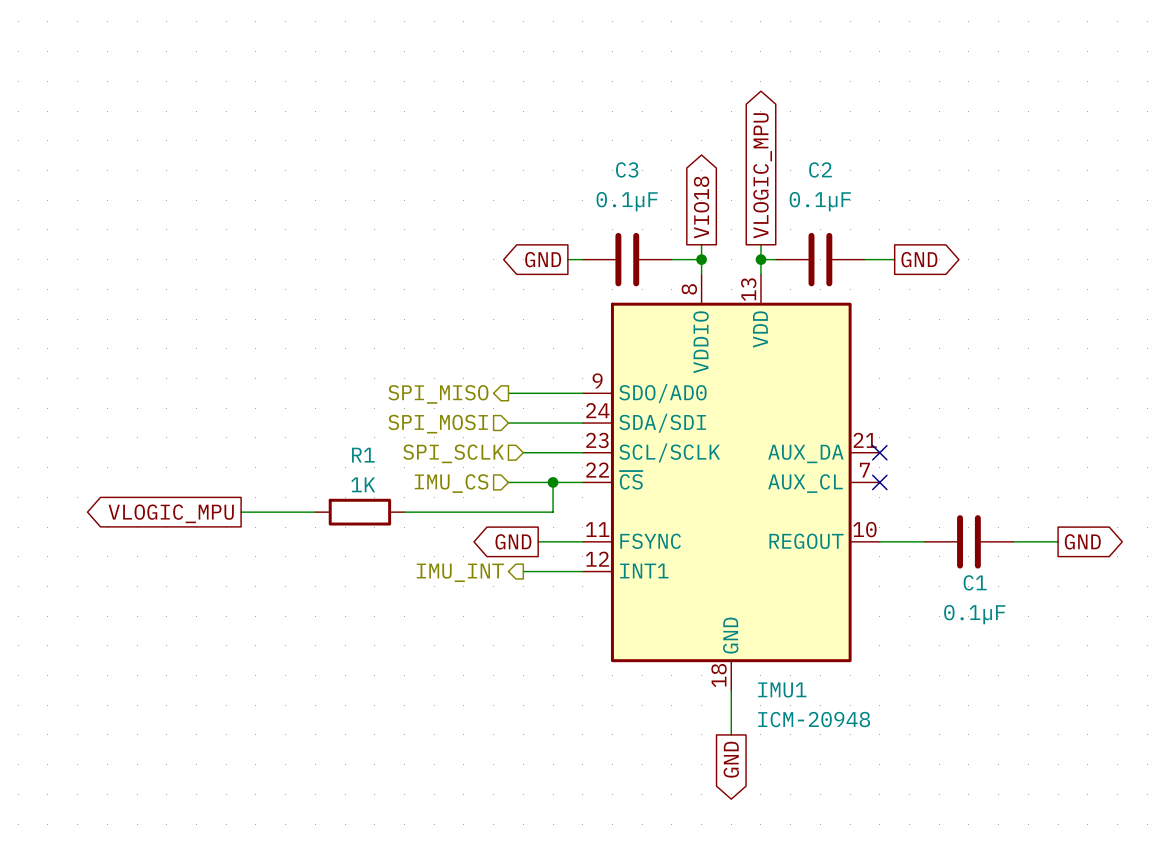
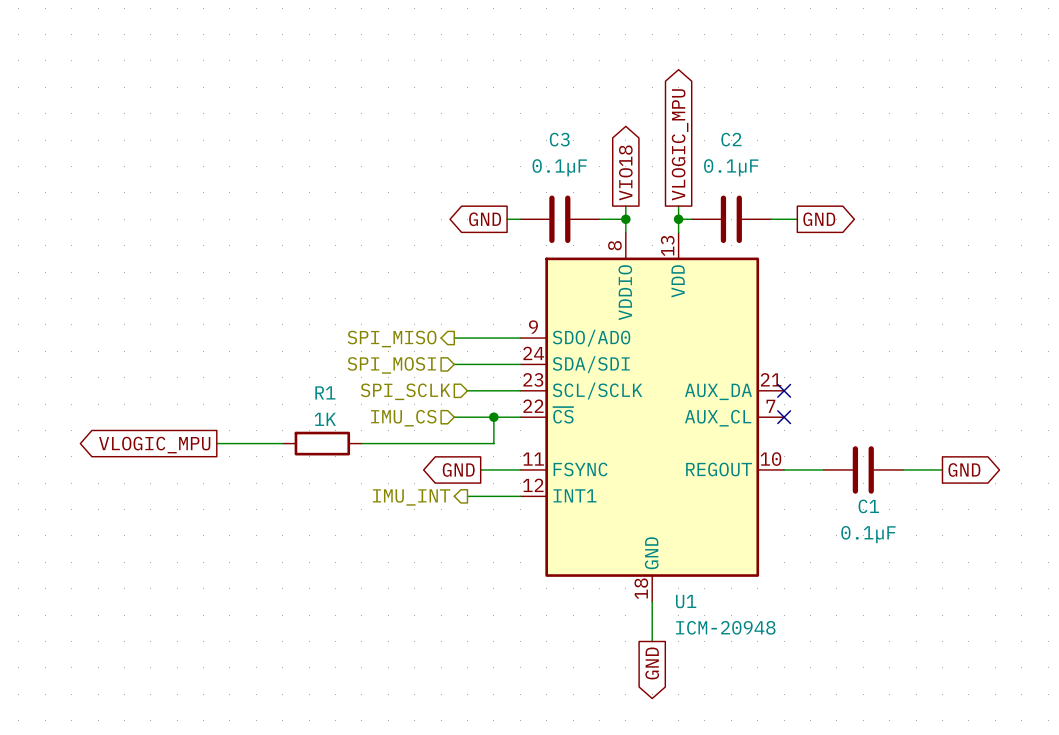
IMU1 name: IMU1 (782, 689) -> U1 (686, 601)

